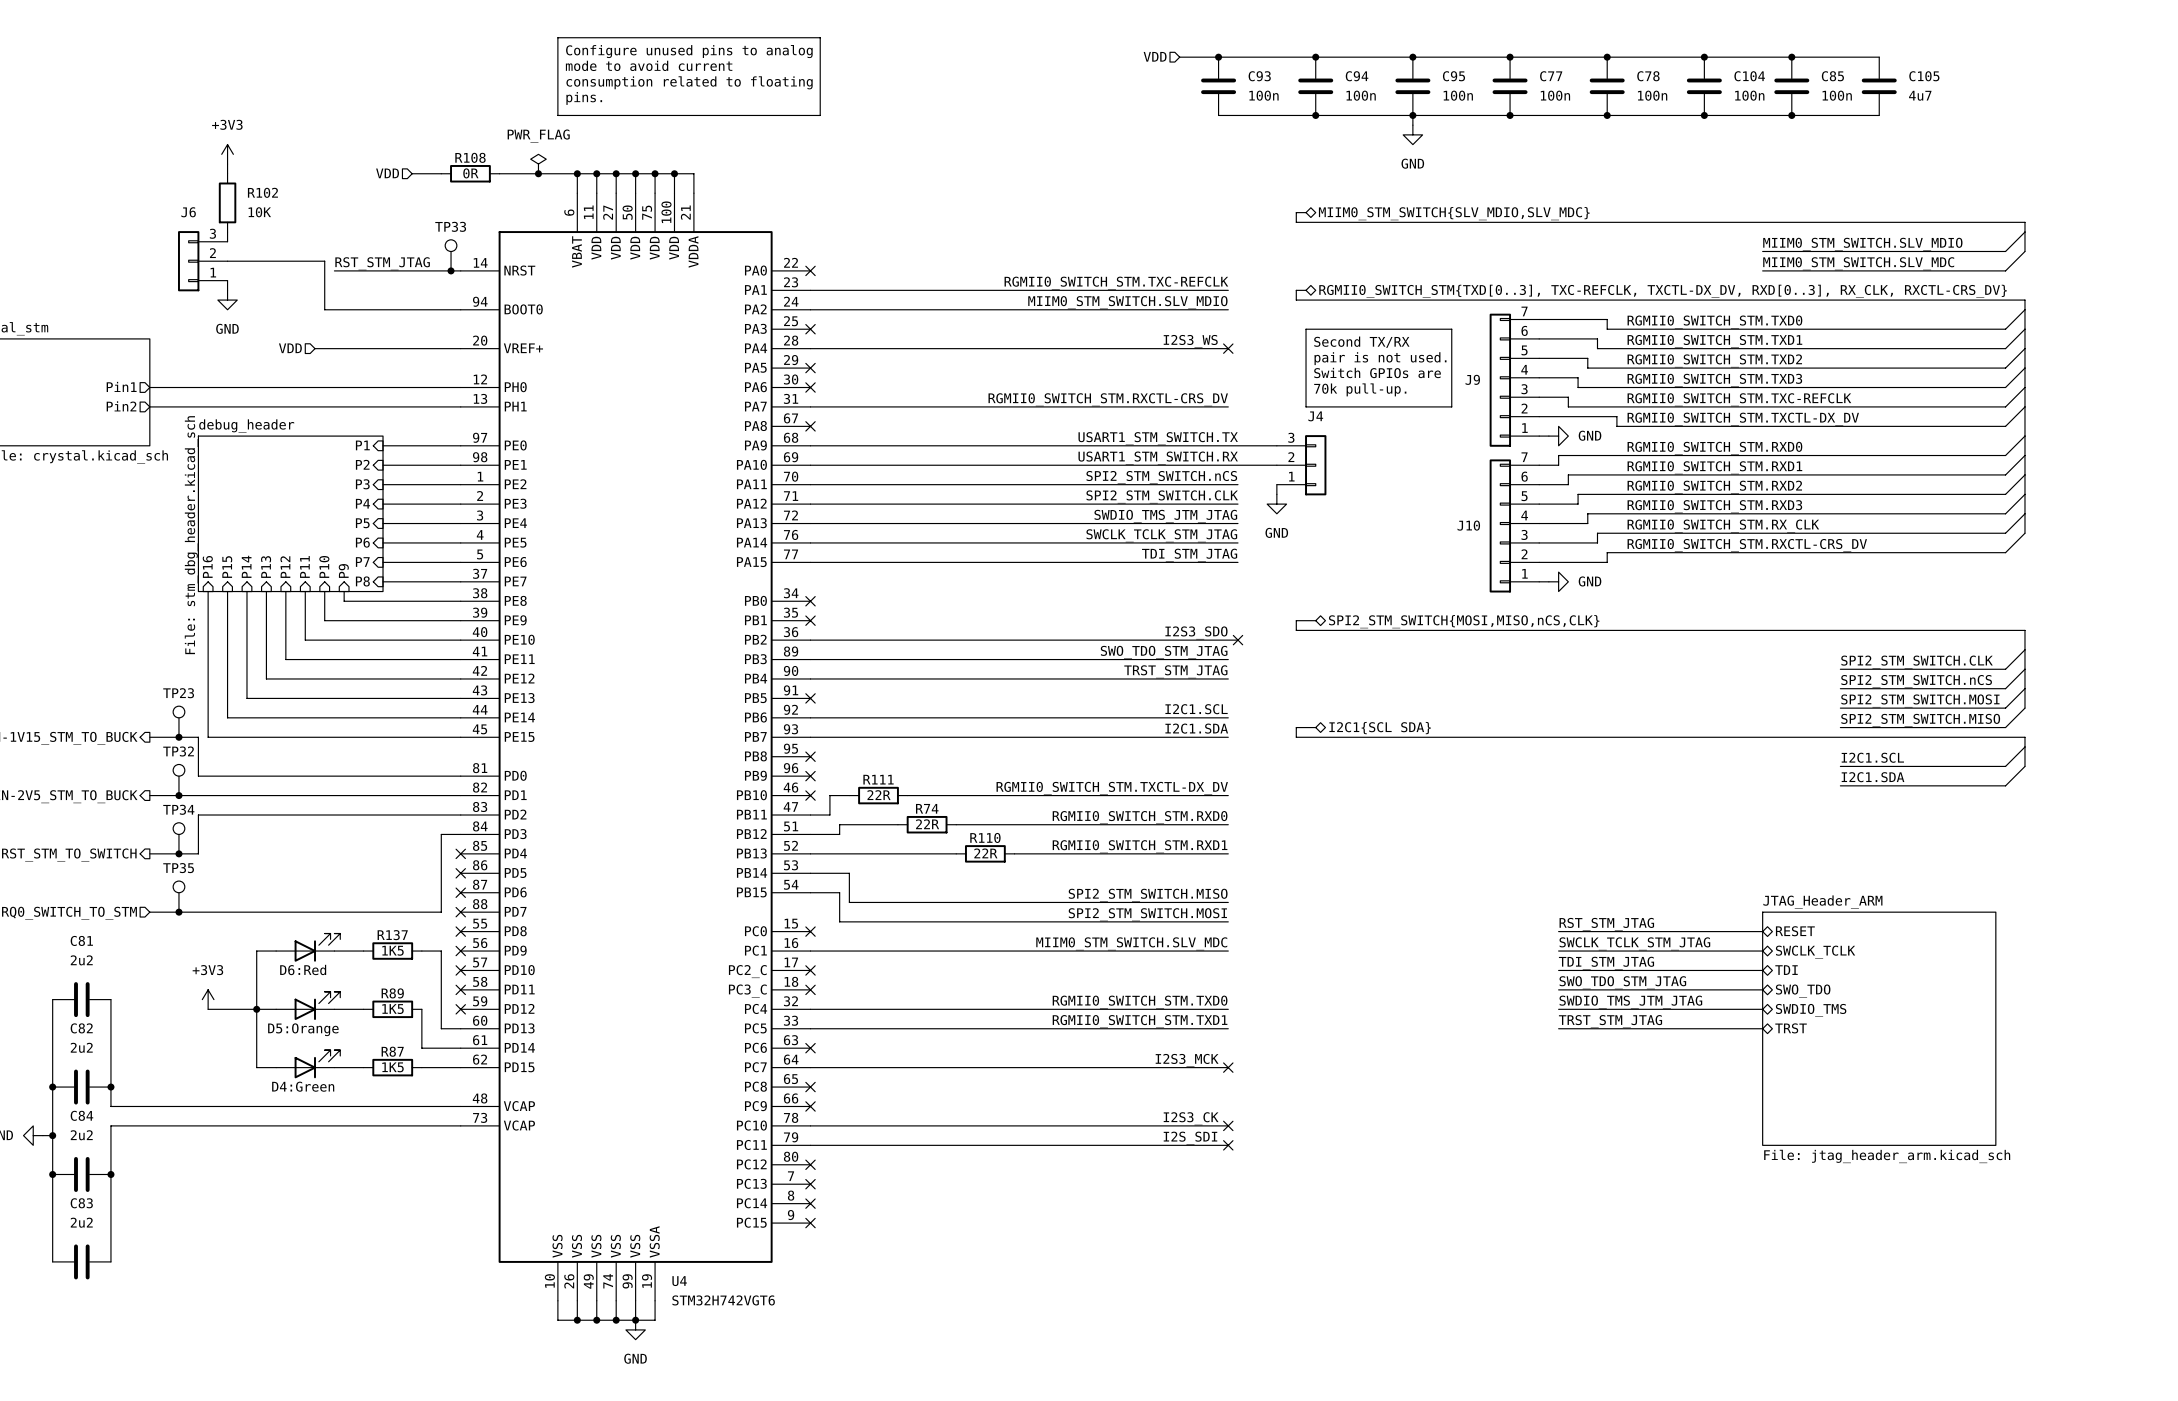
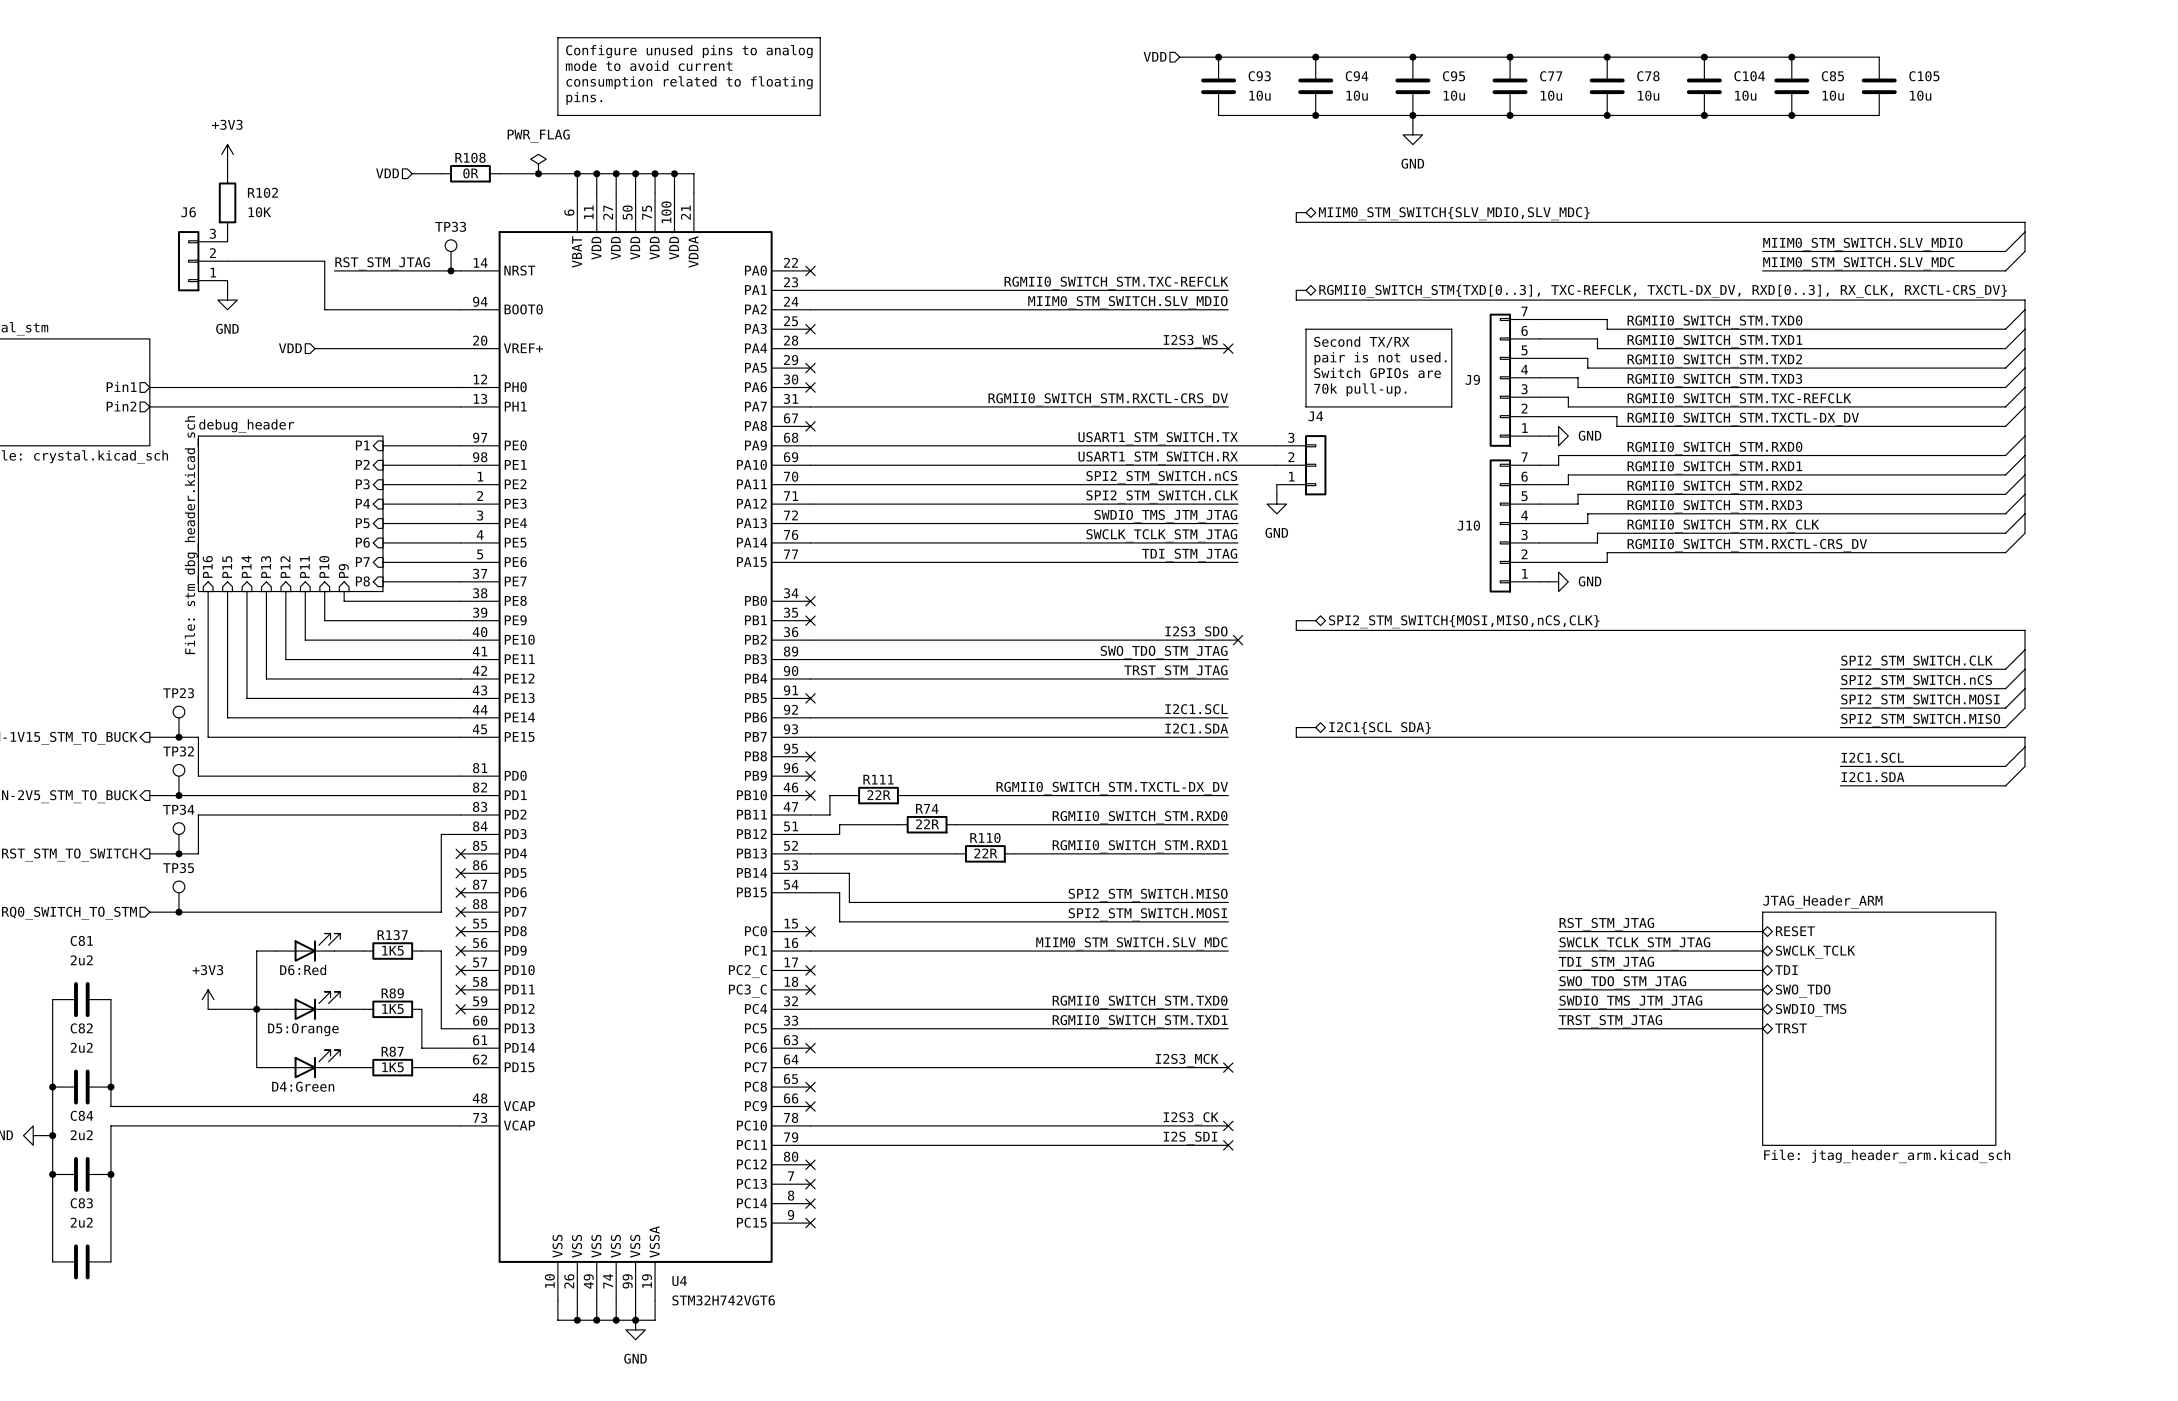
C93 value: 100n (1263, 95) -> 10u (1259, 95)
C94 value: 100n (1361, 95) -> 10u (1357, 95)
C95 value: 100n (1458, 95) -> 10u (1454, 95)
C77 value: 100n (1555, 95) -> 10u (1551, 95)
C78 value: 100n (1652, 95) -> 10u (1648, 95)
C104 value: 100n (1749, 95) -> 10u (1745, 95)
C85 value: 100n (1837, 95) -> 10u (1833, 95)
C105 value: 4u7 (1920, 95) -> 10u (1920, 95)

